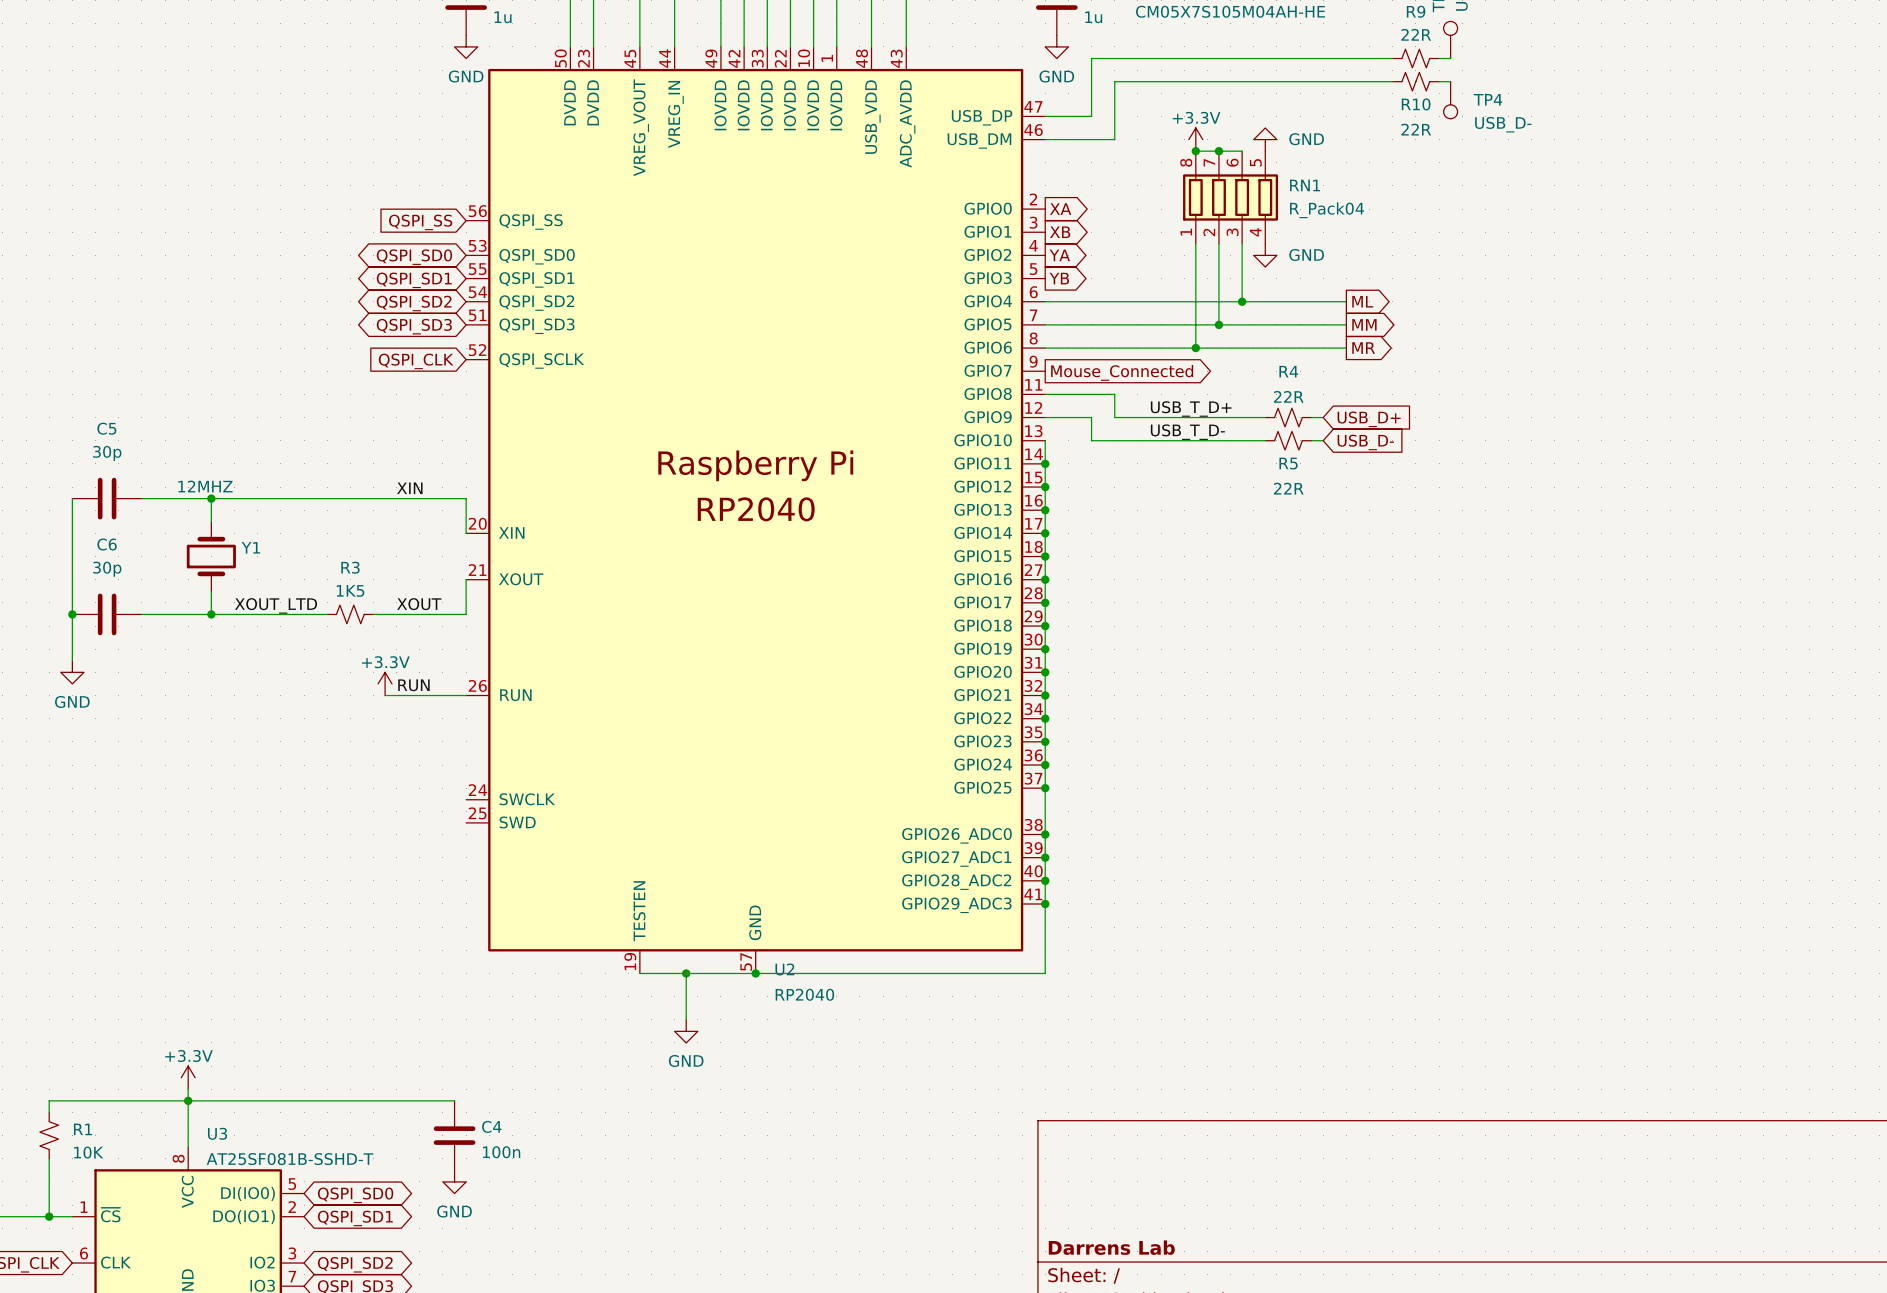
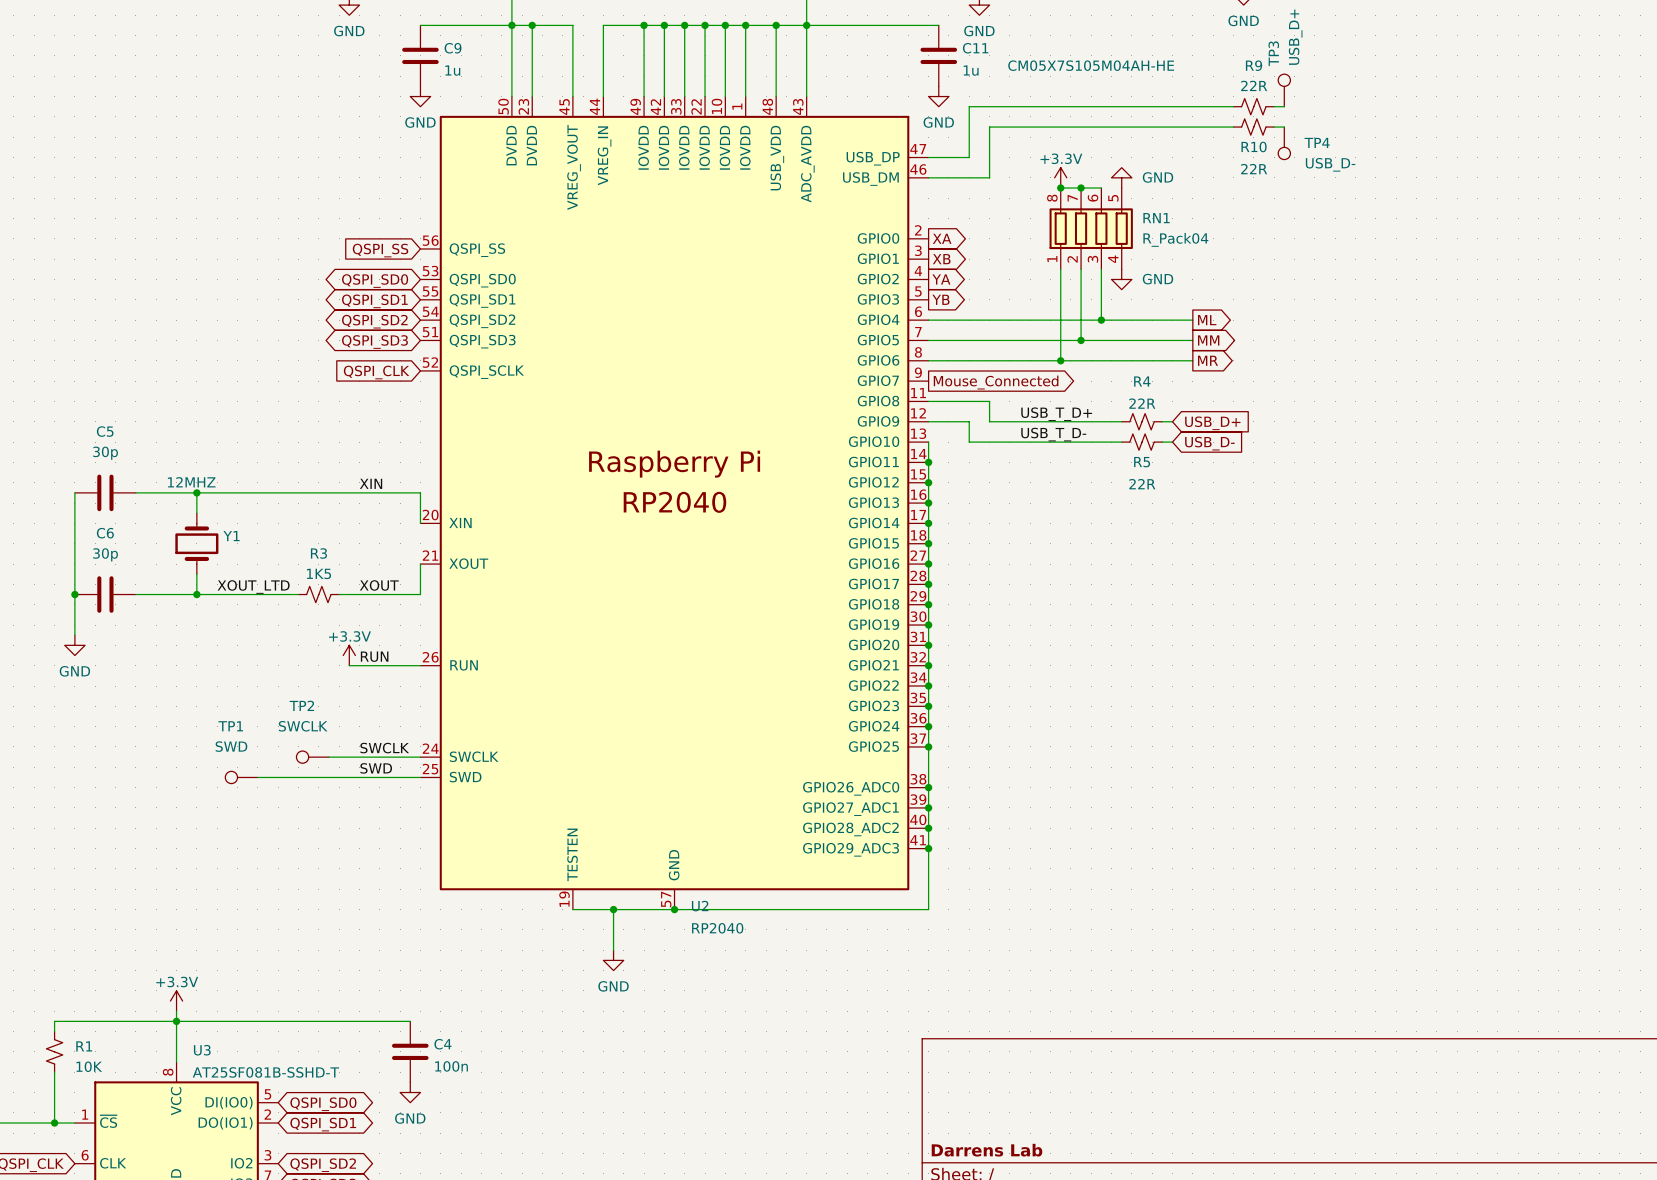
label: none -> SWCLK (384, 748)
TP2: none -> SWCLK (312, 757)
wire: none -> (328, 757) (420, 757)
label: none -> SWD (376, 768)
TP1: none -> SWD (241, 777)
wire: none -> (257, 777) (420, 777)

